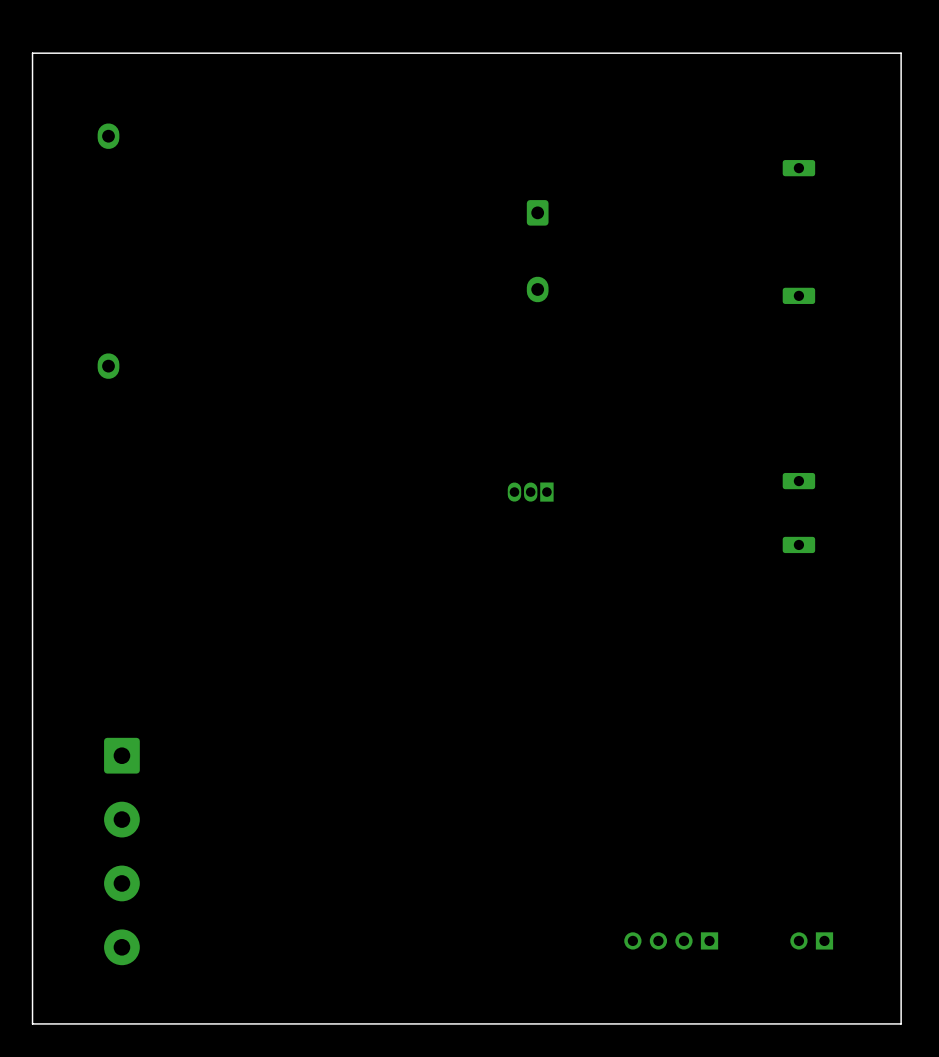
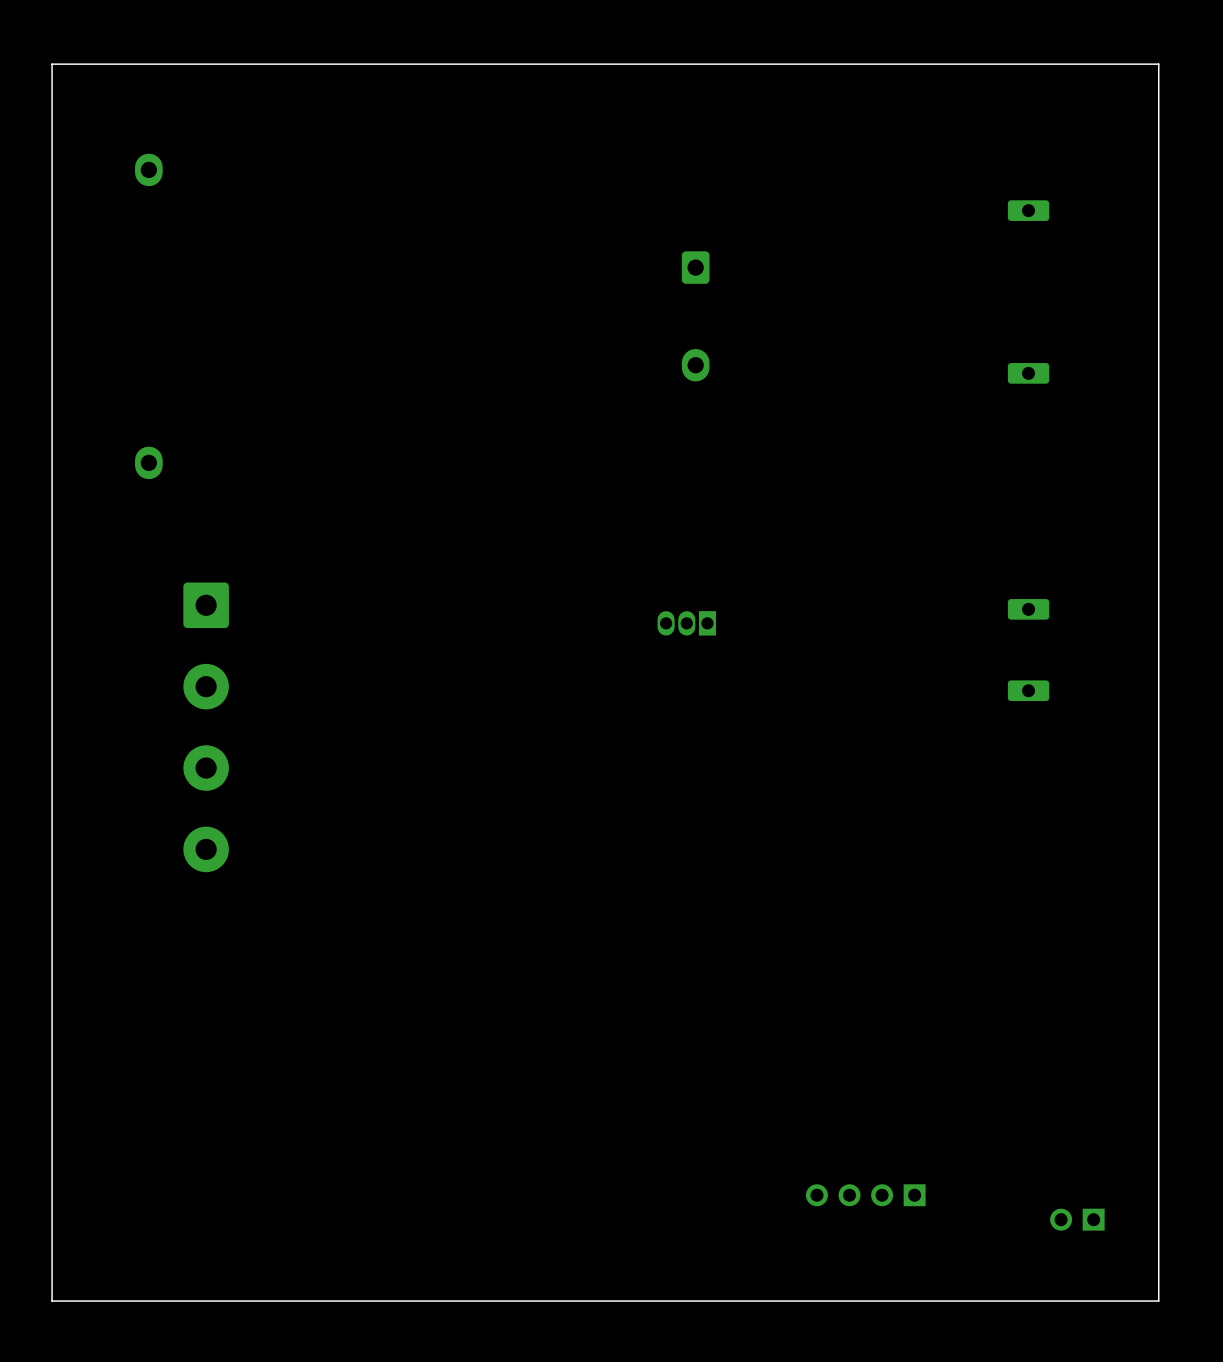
part position: (121, 851) -> (206, 727)
part position: (811, 940) -> (1077, 1219)

